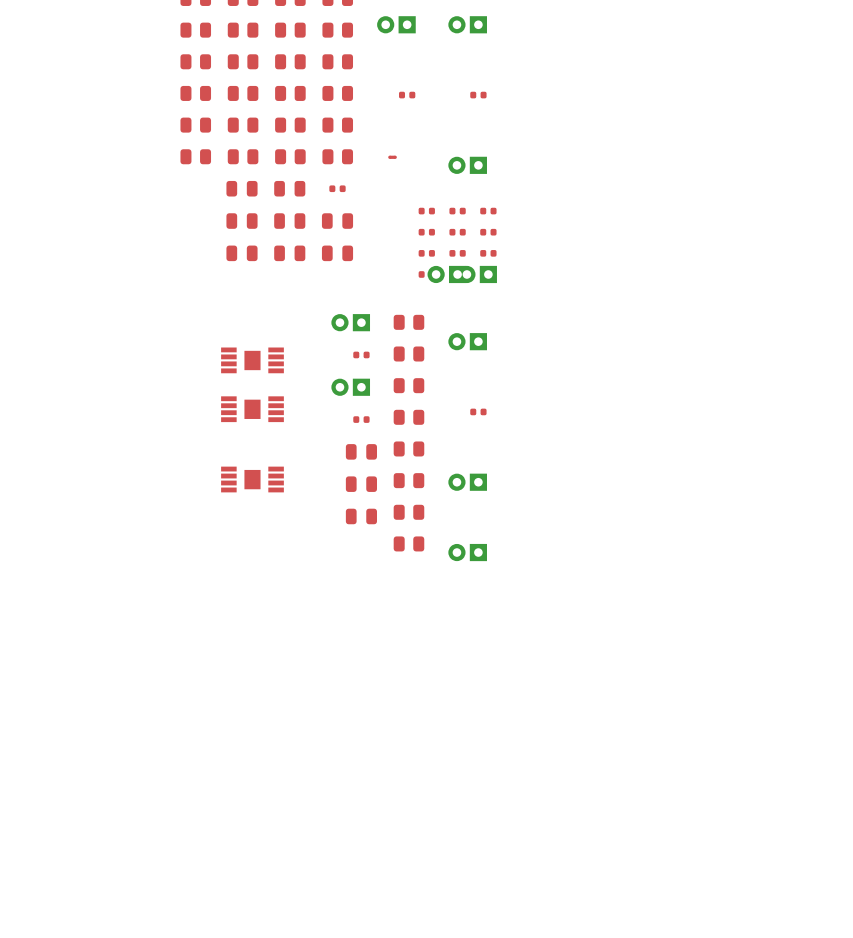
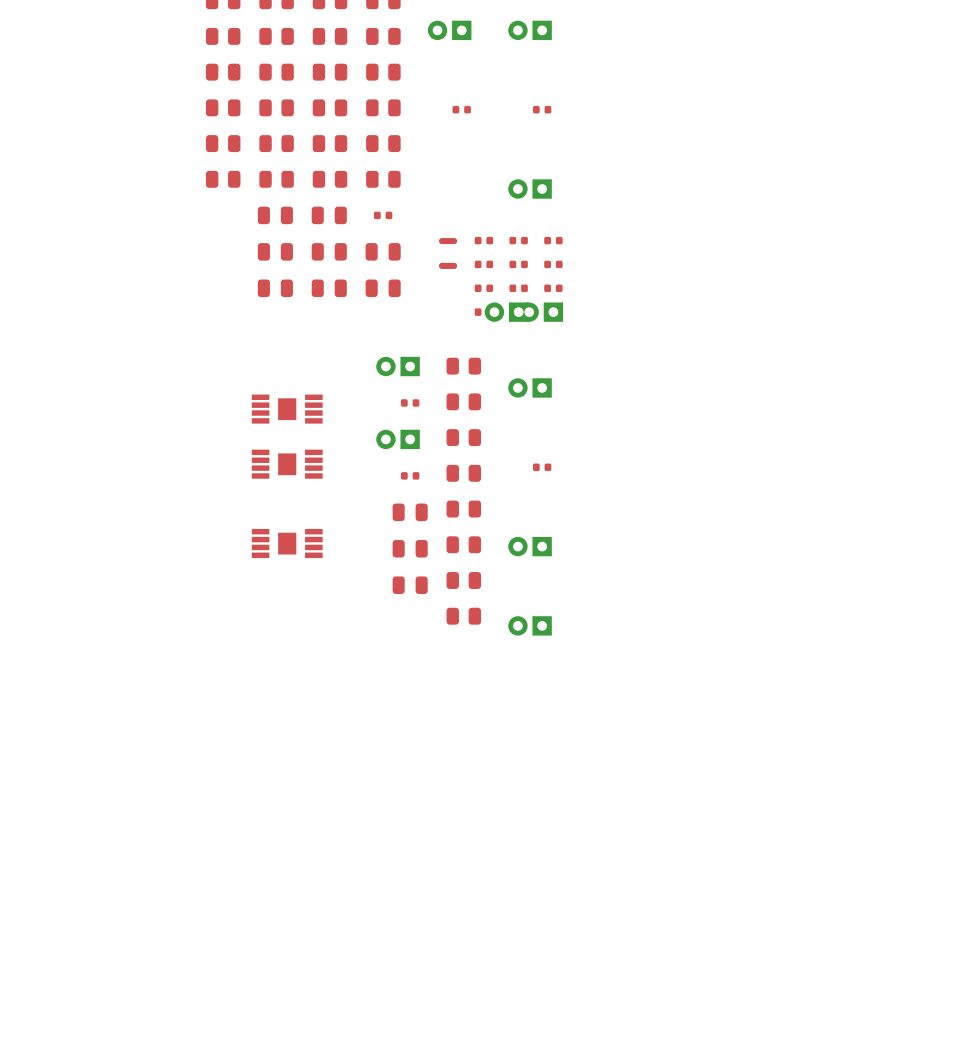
part: (392, 157) -> none
part: none -> (448, 241)
part: none -> (448, 265)

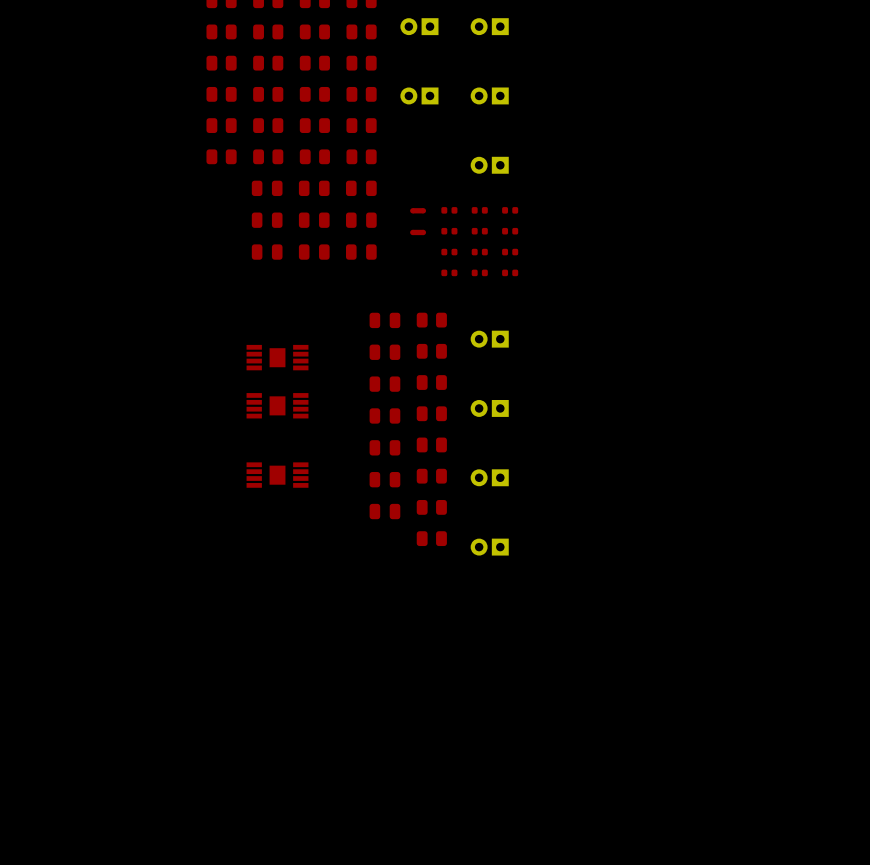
part footprint: [452, 105, 471, 114] -> [400, 87, 439, 105]
part footprint: [532, 105, 552, 114] -> [470, 87, 509, 105]
part footprint: [373, 211, 393, 220] -> [346, 180, 377, 197]
part: (506, 312) -> none
part: none -> (479, 272)
part: (541, 312) -> none
part: none -> (510, 272)
part footprint: [376, 356, 420, 377] -> [369, 312, 401, 329]
part footprint: [400, 399, 420, 407] -> [369, 344, 401, 360]
part footprint: [376, 429, 420, 450] -> [369, 376, 401, 392]
part footprint: [532, 463, 552, 472] -> [470, 399, 509, 417]
part footprint: [400, 472, 420, 480] -> [369, 408, 401, 424]

